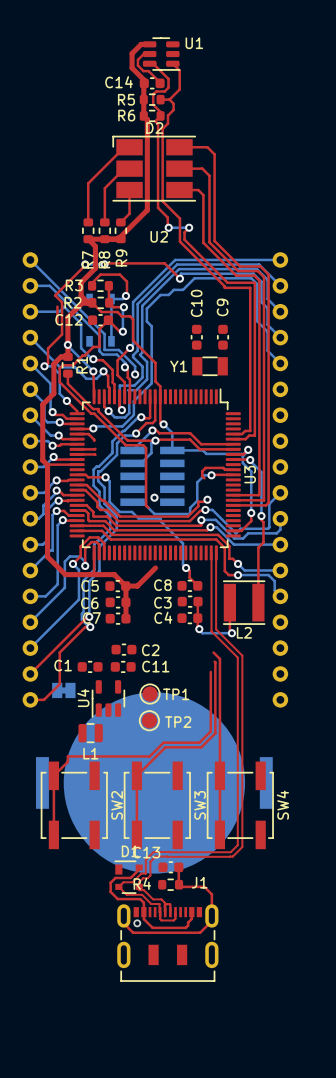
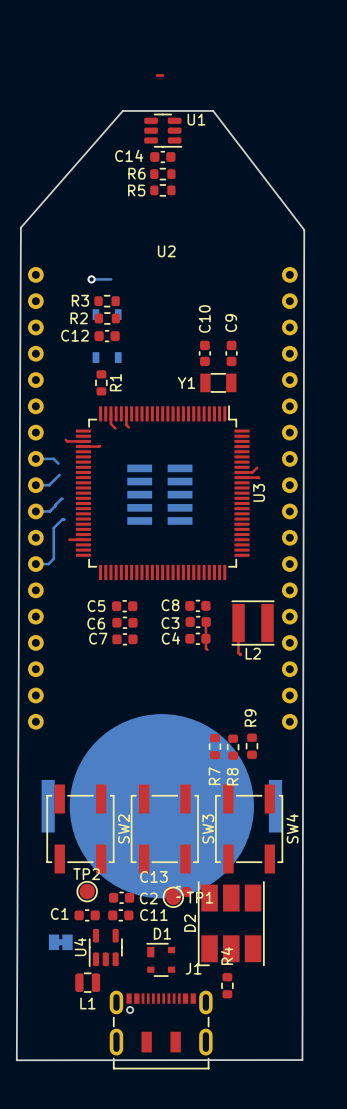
top track: (149, 44) (141, 44) (132, 53) (132, 68) (144, 80) (143, 115) (147, 119) (147, 210) (118, 239) -> none
top track: (149, 54) (143, 54) (137, 59) (137, 65) (143, 71) (148, 71) (160, 83) -> none
U1 position: (161, 54) -> (163, 130)
top track: (153, 63) (168, 78) (168, 87) (164, 91) (156, 91) (153, 94) (153, 104) (160, 112) (160, 115) (155, 121) (158, 124) (158, 207) (167, 217) (168, 227) -> none
top track: (172, 63) (179, 70) (179, 89) (169, 99) -> none
C14 position: (152, 83) -> (162, 157)
board edge: none -> (122, 110) (20, 227) (16, 1060) (302, 1060) (304, 229) (213, 110) (122, 110)
R5 position: (152, 99) -> (162, 190)
top track: (160, 99) (169, 99) -> none
top track: (169, 99) (173, 103) (173, 109) (167, 115) (167, 123) (162, 128) (162, 201) (179, 218) (179, 241) (224, 287) (250, 287) (250, 430) (245, 430) (242, 434) (233, 434) -> none
R6 position: (152, 115) -> (162, 174)
top track: (129, 147) (124, 147) (88, 183) (88, 222) -> none
top track: (179, 147) (207, 147) (214, 154) (214, 240) (240, 266) (260, 266) (268, 274) (268, 502) (266, 505) (233, 505) -> none
top track: (129, 168) (124, 168) (104, 188) (104, 222) -> none
D2 rotation: 0° (154, 168) -> 90° counterclockwise (231, 923)
D2 position: (154, 168) -> (231, 923)
top track: (179, 168) (202, 168) (209, 175) (209, 242) (238, 271) (257, 271) (264, 277) (264, 500) (233, 500) -> none
top track: (129, 190) (129, 213) (120, 222) -> none
top track: (179, 190) (198, 190) (203, 195) (203, 242) (236, 275) (254, 275) (259, 280) (259, 494) (233, 495) -> none
bottom track: (168, 227) (189, 227) -> none
via: (168, 227) -> none
top track: (189, 227) (184, 232) (184, 239) (227, 282) (254, 283) (254, 435) (249, 435) (245, 439) (233, 439) -> none
via: (189, 227) -> none
R7 position: (88, 230) -> (214, 746)
R8 position: (104, 230) -> (233, 747)
R9 position: (120, 230) -> (251, 746)
top track: (120, 238) (88, 239) (95, 246) (95, 268) (81, 282) (81, 296) (88, 303) -> none
R9 name position: R9 (121, 258) -> R9 (250, 717)
bottom track: (30, 259) (104, 334) (104, 349) (118, 349) (135, 366) (135, 374) -> none
bottom track: (280, 259) (175, 259) (133, 302) (133, 344) (130, 347) -> none
top track: (87, 264) (55, 295) (62, 302) (62, 334) (48, 348) (48, 363) (44, 366) (46, 365) -> none
top track: (104, 264) (164, 263) (179, 278) -> none
via: (104, 264) -> none
bottom track: (179, 277) (180, 273) (253, 273) (261, 281) (261, 302) (267, 308) (267, 324) (280, 337) -> none
via: (179, 278) -> none
bottom track: (267, 279) (257, 269) (179, 269) (142, 305) (142, 352) (140, 354) (147, 361) (147, 379) (136, 390) (128, 390) (129, 413) (124, 417) (114, 417) (108, 411) -> none
bottom track: (267, 279) (267, 299) (280, 311) -> none
bottom track: (30, 285) (49, 285) (99, 336) (99, 351) (102, 354) (116, 354) (125, 363) (124, 367) (125, 365) -> none
top track: (92, 285) (92, 283) (100, 274) (119, 274) (126, 281) (125, 296) -> none
top track: (108, 285) (108, 302) (113, 307) (123, 307) -> none
bottom track: (280, 285) (259, 264) (177, 264) (137, 304) (137, 350) (133, 357) (142, 366) (142, 377) (134, 385) (119, 385) (119, 408) (121, 410) -> none
bottom track: (125, 296) (122, 299) (111, 299) (111, 341) -> none
via: (125, 296) -> none
bottom track: (124, 305) (122, 307) (122, 331) -> none
top track: (57, 306) (57, 322) -> none
via: (123, 307) -> none
bottom track: (30, 311) (59, 311) (64, 306) (81, 323) (81, 348) (93, 360) -> none
top track: (109, 319) (99, 329) (99, 346) (93, 346) (72, 365) (62, 365) (59, 368) (59, 382) (125, 445) (143, 445) (146, 448) (146, 505) (148, 507) -> none
top track: (108, 320) (119, 331) (122, 331) -> none
via: (122, 331) -> none
bottom track: (30, 337) (60, 367) (75, 367) (86, 378) (96, 378) (103, 370) -> none
bottom track: (67, 344) (67, 348) (70, 348) (93, 371) -> none
via: (67, 344) -> none
top track: (130, 347) (117, 360) (117, 375) (124, 382) (124, 396) -> none
via: (130, 347) -> none
via: (93, 359) -> none
top track: (93, 360) (102, 360) (112, 370) (114, 396) -> none
bottom track: (30, 363) (50, 383) (51, 412) -> none
bottom track: (280, 363) (267, 350) (267, 331) (256, 320) (256, 283) (251, 278) (194, 278) (183, 289) (173, 289) (168, 294) (160, 294) (146, 308) (146, 321) (151, 326) (151, 383) (133, 401) (133, 415) (122, 426) (94, 426) (92, 428) -> none
R1 position: (67, 365) -> (101, 382)
bottom track: (44, 366) (51, 366) (59, 372) (59, 393) (66, 400) -> none
via: (44, 366) -> none
top track: (124, 367) (127, 370) (127, 377) (129, 379) (129, 396) -> none
via: (124, 367) -> none
via: (93, 371) -> none
top track: (94, 371) (94, 396) -> none
top track: (103, 371) (108, 375) (109, 396) -> none
via: (103, 371) -> none
top track: (67, 373) (67, 383) (93, 409) (98, 409) (98, 411) (127, 440) (155, 440) -> none
via: (135, 374) -> none
bottom track: (30, 389) (44, 403) (44, 419) (47, 422) (59, 422) -> none
top track: (150, 396) (150, 417) (141, 417) (144, 418) -> none
top track: (155, 396) (155, 420) (152, 423) (146, 423) (136, 433) -> none
top track: (66, 400) (77, 411) (77, 413) -> none
via: (66, 400) -> none
via: (121, 410) -> none
via: (108, 411) -> none
top track: (52, 412) (55, 414) (62, 414) (66, 418) (77, 418) -> none
via: (52, 412) -> none
bottom track: (30, 415) (50, 435) (58, 435) -> none
bottom track: (141, 417) (138, 417) (112, 441) (112, 453) (93, 469) (93, 485) (99, 491) (99, 505) (110, 515) (110, 529) (94, 544) (94, 569) (83, 580) (81, 619) (90, 627) -> none
via: (141, 417) -> none
via: (59, 422) -> none
bottom track: (163, 424) (172, 433) (172, 450) (202, 450) (206, 453) (244, 453) (248, 449) -> none
via: (163, 424) -> none
top track: (162, 425) (160, 423) (160, 386) (155, 381) (155, 362) (133, 340) (133, 319) (130, 316) (121, 316) (117, 312) (101, 312) (92, 302) (82, 303) (67, 317) (67, 356) (61, 356) (53, 364) (53, 393) (42, 404) (42, 460) (47, 465) -> none
via: (93, 428) -> none
top track: (152, 430) (155, 429) (159, 433) (190, 433) (201, 444) (233, 444) -> none
bottom track: (152, 430) (132, 450) -> none
via: (152, 430) -> none
bottom track: (136, 433) (134, 435) (124, 435) (117, 443) (117, 454) (98, 471) (98, 481) (104, 487) (104, 503) (116, 516) (116, 529) (99, 545) (99, 571) (89, 581) (89, 616) -> none
via: (136, 433) -> none
top track: (77, 434) (88, 434) (94, 440) -> none
via: (58, 435) -> none
top track: (59, 435) (62, 439) (77, 439) -> none
top track: (154, 439) (190, 439) (199, 449) (233, 449) -> none
bottom track: (155, 440) (151, 442) (151, 452) (141, 463) (132, 463) -> none
via: (155, 440) -> none
top track: (77, 444) (52, 445) -> none
via: (52, 445) -> none
top track: (95, 448) (77, 449) -> none
bottom track: (248, 449) (242, 456) (242, 463) (251, 471) (251, 512) -> none
via: (248, 449) -> none
top track: (77, 454) (95, 454) -> none
top track: (53, 456) (56, 459) (77, 459) -> none
via: (53, 456) -> none
bottom track: (250, 460) (261, 472) (261, 516) -> none
via: (250, 460) -> none
top track: (77, 464) (47, 465) -> none
top track: (47, 465) (47, 556) (65, 574) (114, 574) (125, 586) (125, 618) -> none
top track: (233, 469) (205, 467) (202, 471) (204, 478) -> none
top track: (77, 474) (85, 474) (88, 477) (105, 477) -> none
top track: (233, 474) (211, 475) -> none
via: (211, 475) -> none
bottom track: (212, 475) (204, 475) (197, 482) (197, 500) (190, 507) (190, 514) (154, 514) (142, 502) (132, 502) -> none
bottom track: (105, 477) (109, 481) (109, 501) (119, 511) (132, 511) (138, 518) (160, 518) (160, 521) (183, 543) (183, 564) (186, 568) -> none
via: (105, 477) -> none
top track: (77, 479) (56, 480) -> none
via: (56, 480) -> none
top track: (77, 485) (86, 485) (120, 516) (187, 516) (198, 506) (198, 501) (207, 500) -> none
top track: (56, 490) (63, 495) (77, 495) -> none
bottom track: (56, 490) (43, 505) (43, 514) (38, 518) (30, 518) -> none
via: (56, 490) -> none
top track: (77, 490) (85, 490) (97, 502) (97, 506) (100, 509) (107, 509) (118, 521) (189, 521) (200, 510) (205, 510) -> none
bottom track: (280, 492) (269, 503) (268, 528) (240, 528) (235, 533) (212, 509) (205, 509) -> none
via: (154, 497) -> none
via: (207, 499) -> none
via: (58, 500) -> none
top track: (77, 500) (58, 500) -> none
top track: (77, 505) (86, 505) (93, 512) (93, 516) (107, 516) (116, 525) (200, 525) (201, 520) -> none
via: (205, 509) -> none
top track: (56, 510) (64, 510) (68, 515) (77, 515) -> none
bottom track: (56, 510) (52, 515) (52, 550) (50, 550) (30, 570) -> none
via: (56, 510) -> none
top track: (77, 510) (85, 510) (88, 513) (89, 521) (105, 521) (114, 530) (207, 530) (210, 527) -> none
top track: (251, 511) (251, 521) (241, 530) (233, 530) -> none
via: (251, 512) -> none
top track: (261, 516) (263, 522) (263, 542) (258, 547) (258, 602) -> none
via: (261, 516) -> none
bottom track: (280, 518) (280, 529) (276, 533) (248, 533) (243, 538) (234, 538) (215, 519) (201, 520) -> none
bottom track: (62, 520) (57, 525) (57, 584) (45, 596) (30, 596) -> none
via: (62, 520) -> none
via: (201, 520) -> none
top track: (77, 525) (103, 525) (112, 534) (218, 534) (229, 546) (229, 558) (232, 558) (238, 563) -> none
bottom track: (210, 527) (216, 527) (233, 544) (280, 544) -> none
via: (210, 527) -> none
top track: (77, 530) (102, 530) (110, 539) (216, 539) (224, 548) (224, 571) (228, 575) (238, 575) -> none
top track: (94, 552) (94, 571) (91, 574) -> none
top track: (99, 552) (99, 544) (96, 542) (91, 542) (85, 548) (85, 565) -> none
top track: (104, 552) (104, 543) (98, 537) (89, 537) (80, 546) (80, 556) (72, 563) -> none
top track: (211, 552) (211, 631) (237, 657) (237, 845) (230, 852) (153, 851) (145, 859) (145, 873) (141, 873) (132, 882) (123, 882) (118, 886) (126, 894) (142, 894) (151, 903) (159, 903) (161, 920) (173, 920) (175, 912) -> none
top track: (216, 552) (216, 629) (242, 655) (242, 847) (232, 856) (155, 856) (150, 861) (150, 875) (139, 882) (139, 890) (143, 890) (153, 899) (161, 899) (164, 902) (165, 912) -> none
bottom track: (72, 563) (78, 569) (78, 599) (30, 648) -> none
via: (72, 563) -> none
bottom track: (238, 563) (244, 570) (280, 570) -> none
via: (238, 563) -> none
bottom track: (85, 565) (85, 561) (79, 556) (69, 556) (64, 561) (64, 587) (30, 622) -> none
via: (85, 565) -> none
top track: (155, 568) (137, 586) (125, 586) -> none
via: (186, 568) -> none
top track: (187, 568) (189, 570) (189, 577) (197, 585) -> none
bottom track: (238, 575) (268, 575) (274, 581) (274, 590) (280, 596) -> none
via: (238, 575) -> none
top track: (89, 616) (30, 673) -> none
via: (89, 616) -> none
top track: (89, 627) (85, 627) (59, 652) (59, 684) (44, 699) (30, 699) -> none
via: (90, 627) -> none
via: (199, 629) -> none
bottom track: (199, 630) (202, 633) (231, 633) -> none
via: (231, 633) -> none
C2 position: (123, 649) -> (121, 897)
top track: (213, 652) (219, 658) (219, 834) -> none
top track: (214, 661) (215, 733) (201, 747) (165, 747) (136, 775) (136, 834) -> none
C1 position: (90, 666) -> (87, 915)
C11 position: (123, 666) -> (120, 915)
top track: (210, 671) (210, 731) (199, 742) (163, 742) (149, 756) (67, 756) (67, 761) (53, 775) (53, 834) -> none
part position: (63, 690) -> (60, 942)
TP1 position: (150, 694) -> (173, 897)
U4 position: (108, 698) -> (105, 947)
TP2 position: (149, 720) -> (87, 891)
TP2 name position: TP2 (178, 722) -> TP2 (86, 874)
L1 position: (90, 733) -> (87, 982)
top track: (139, 867) (130, 877) (115, 877) (110, 882) (110, 891) (117, 899) (140, 899) (143, 902) (143, 919) (152, 927) (185, 927) (191, 918) (191, 912) -> none
top track: (178, 867) (178, 884) (181, 886) (204, 886) (211, 894) (211, 921) (200, 932) (133, 932) (123, 923) (123, 915) -> none
D1 position: (128, 877) -> (160, 959)
R4 rotation: 0° (170, 884) -> 90° clockwise (227, 985)
R4 position: (170, 884) -> (227, 985)
top track: (164, 906) (170, 904) (170, 912) -> none
J1 position: (167, 942) -> (161, 1029)

